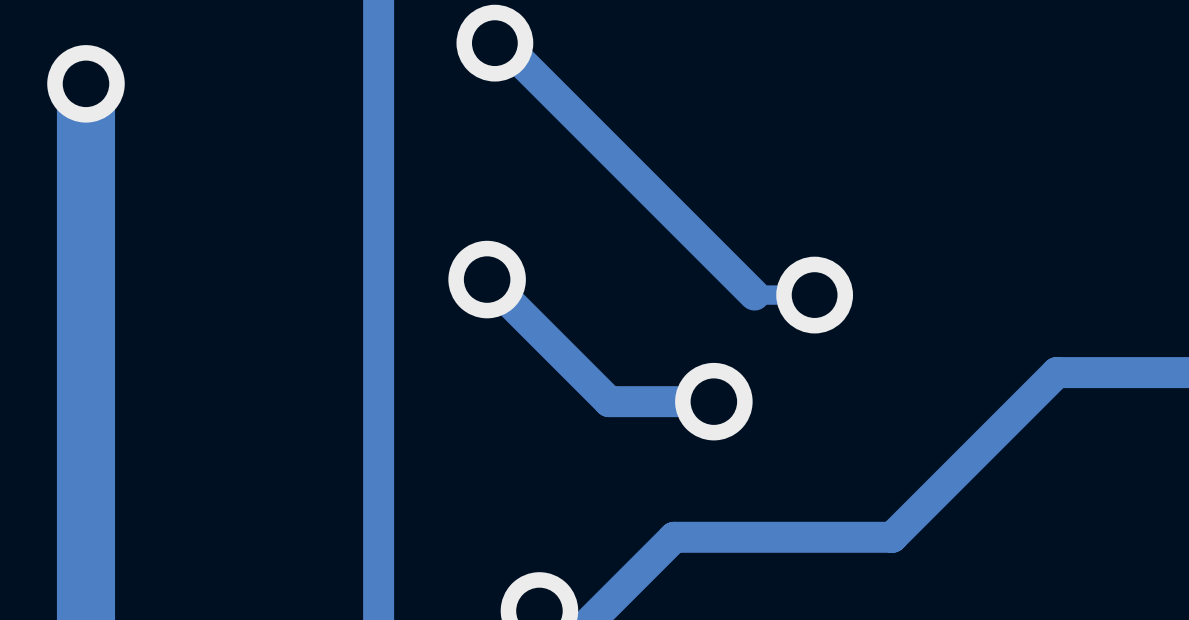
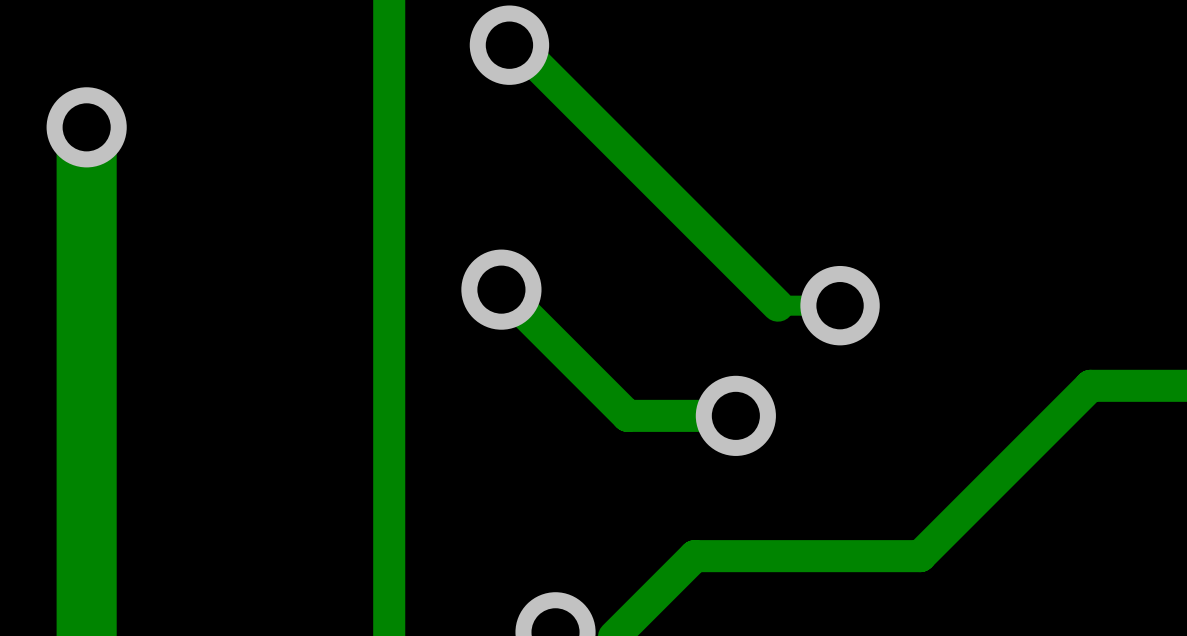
via position: (85, 83) -> (86, 127)

